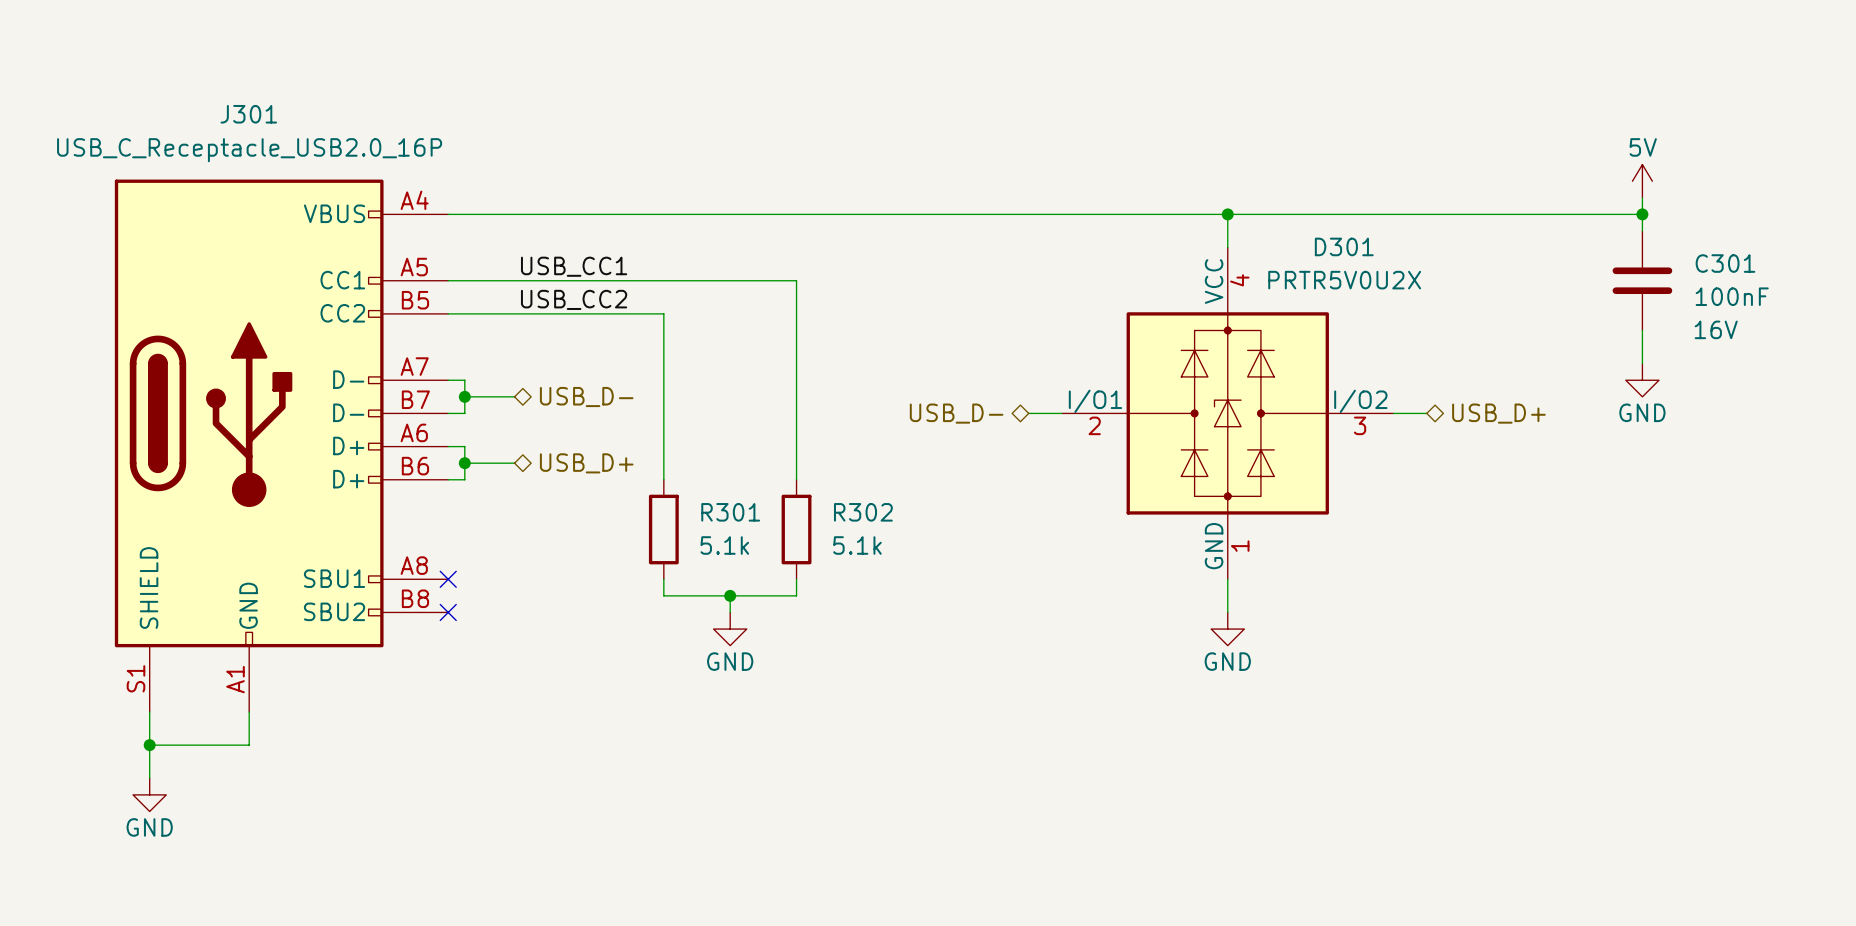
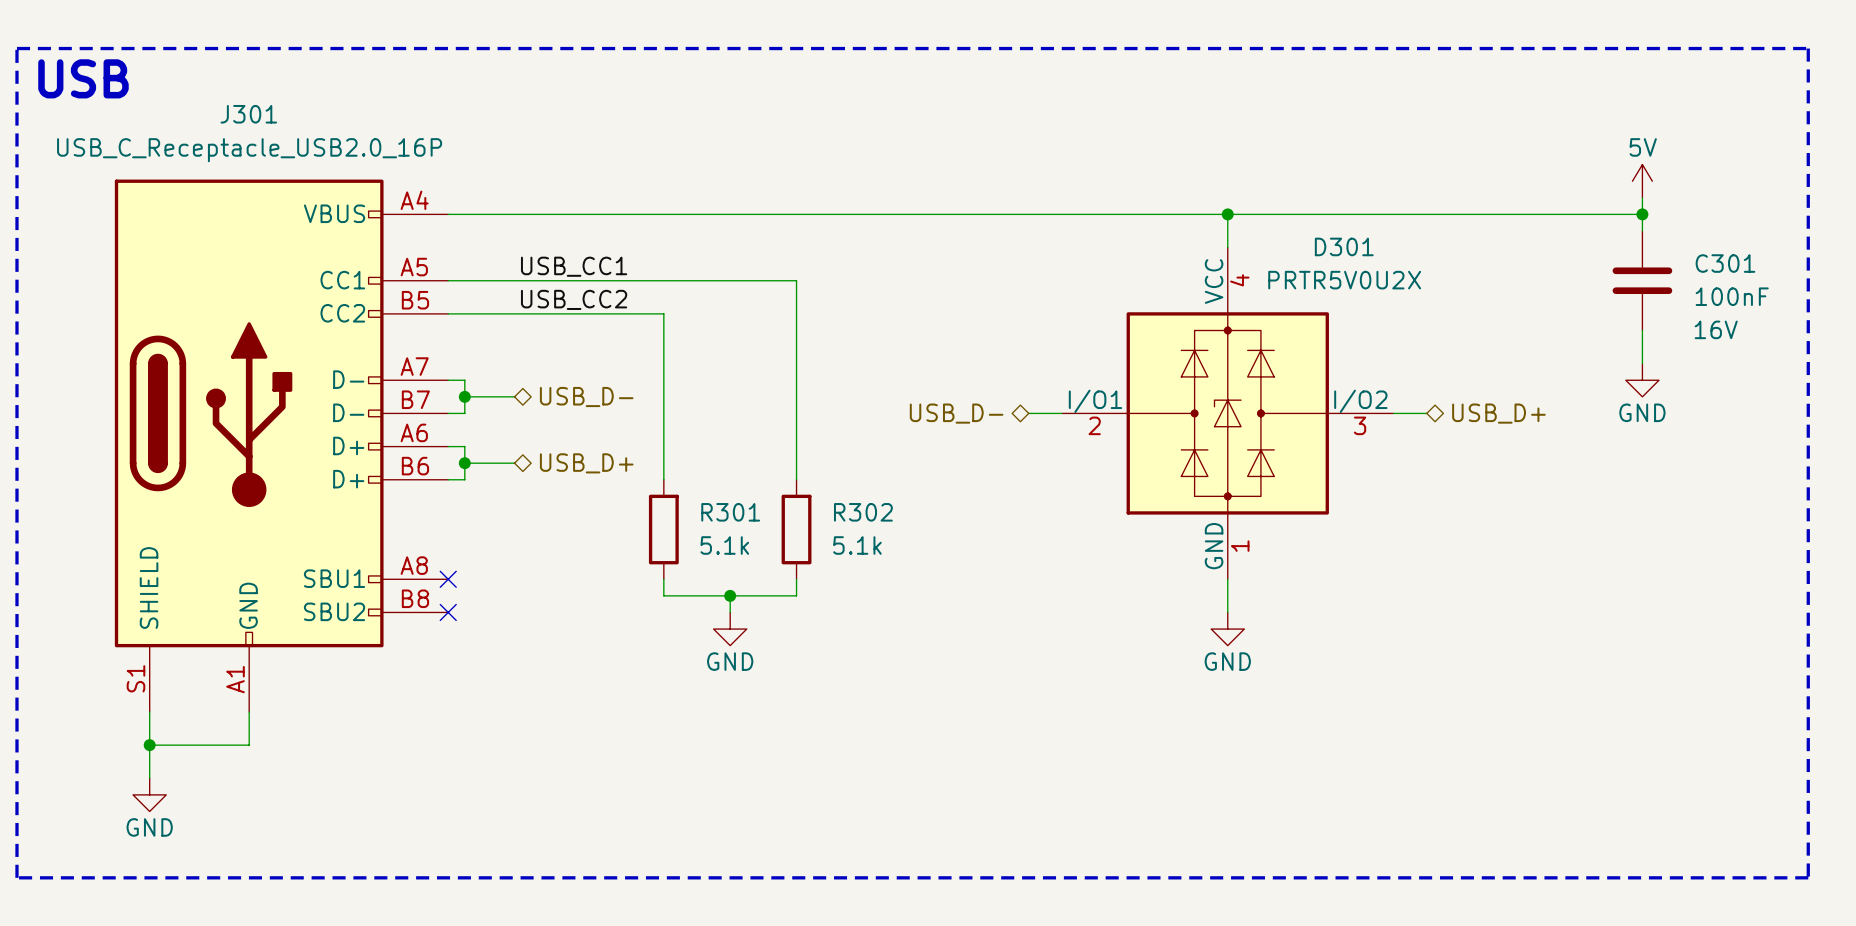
line: none -> (16, 48) (1808, 48) (1808, 877) (16, 877) (16, 48)
text: none -> USB (83, 78)

